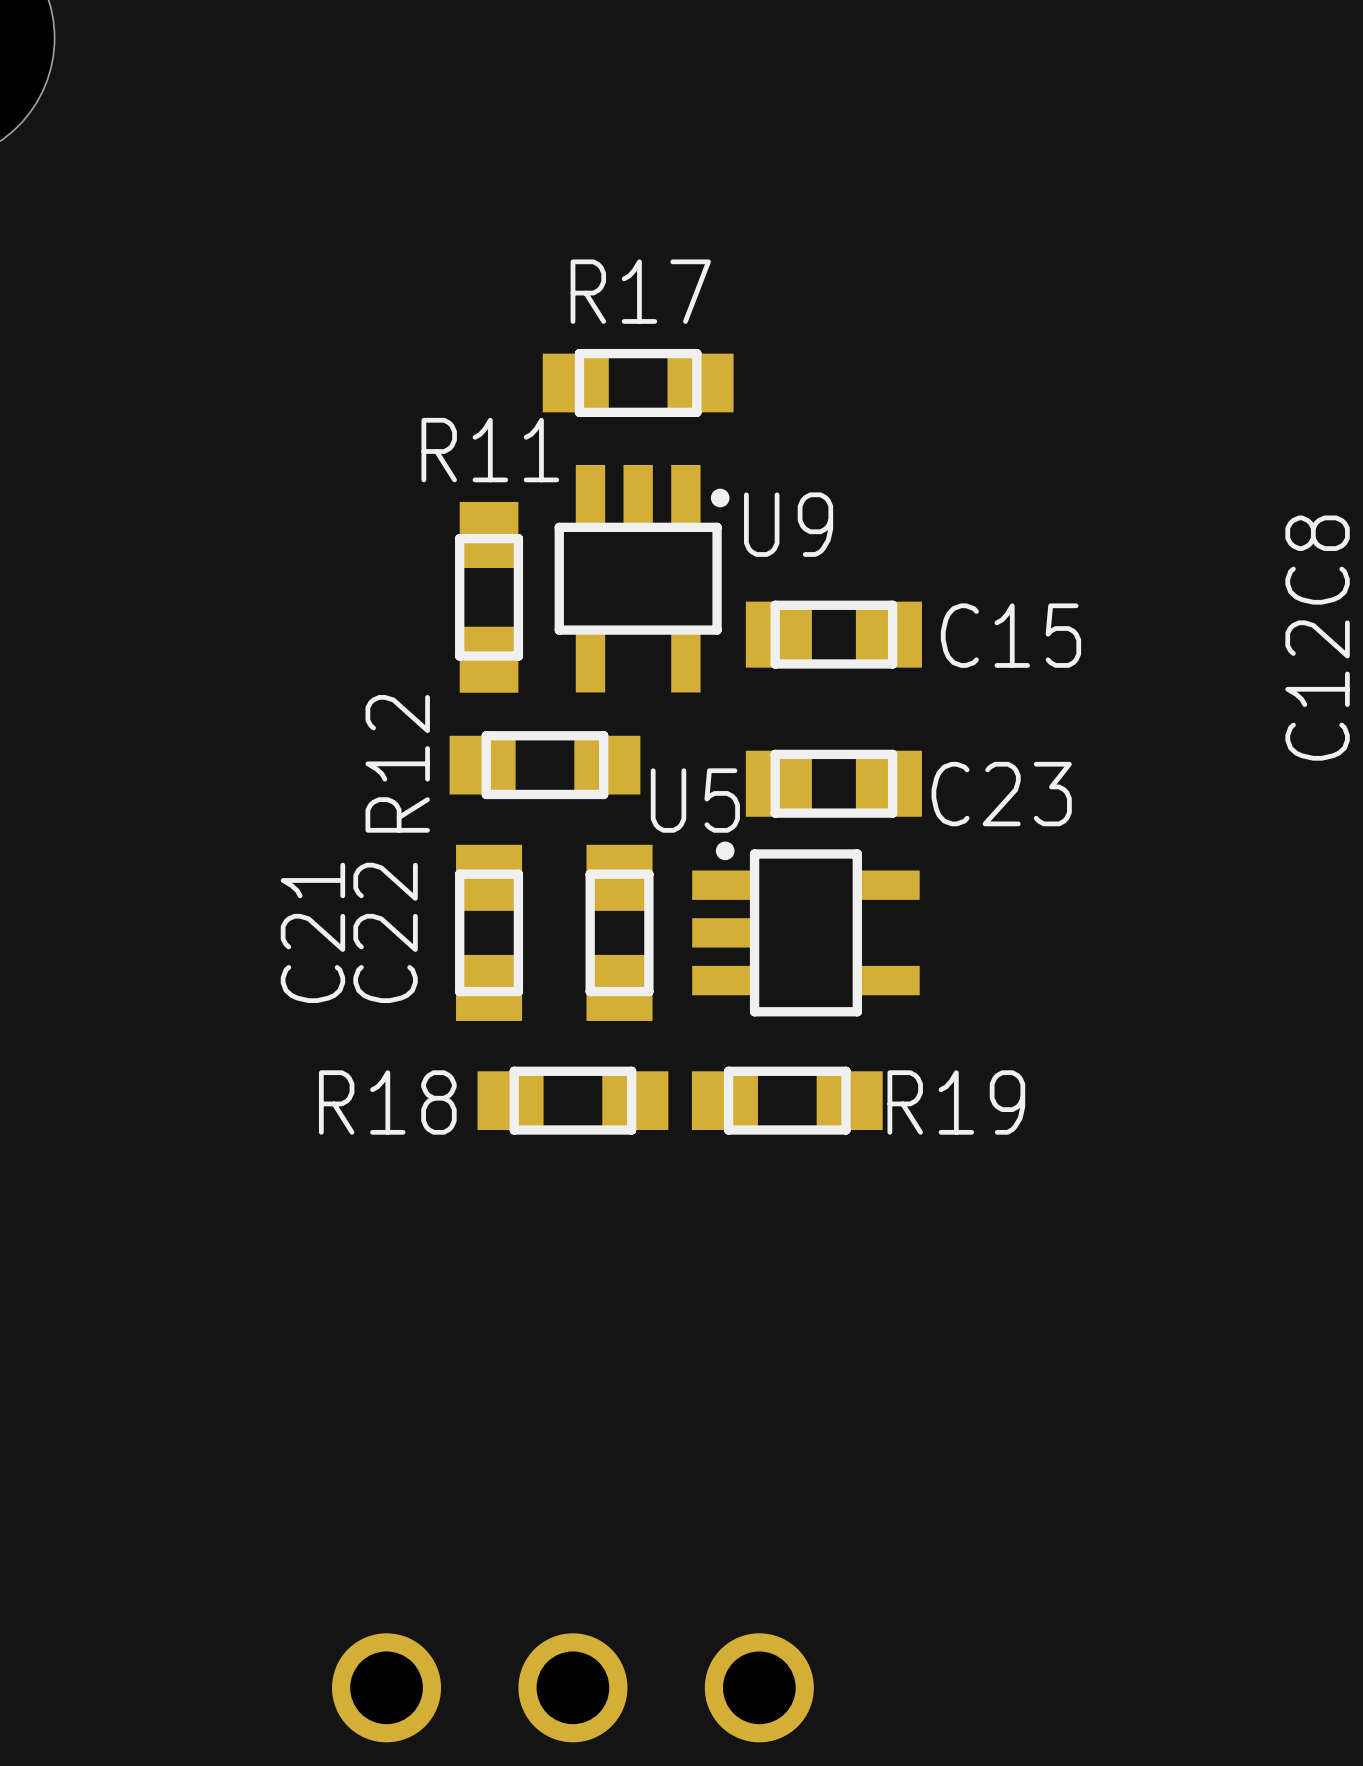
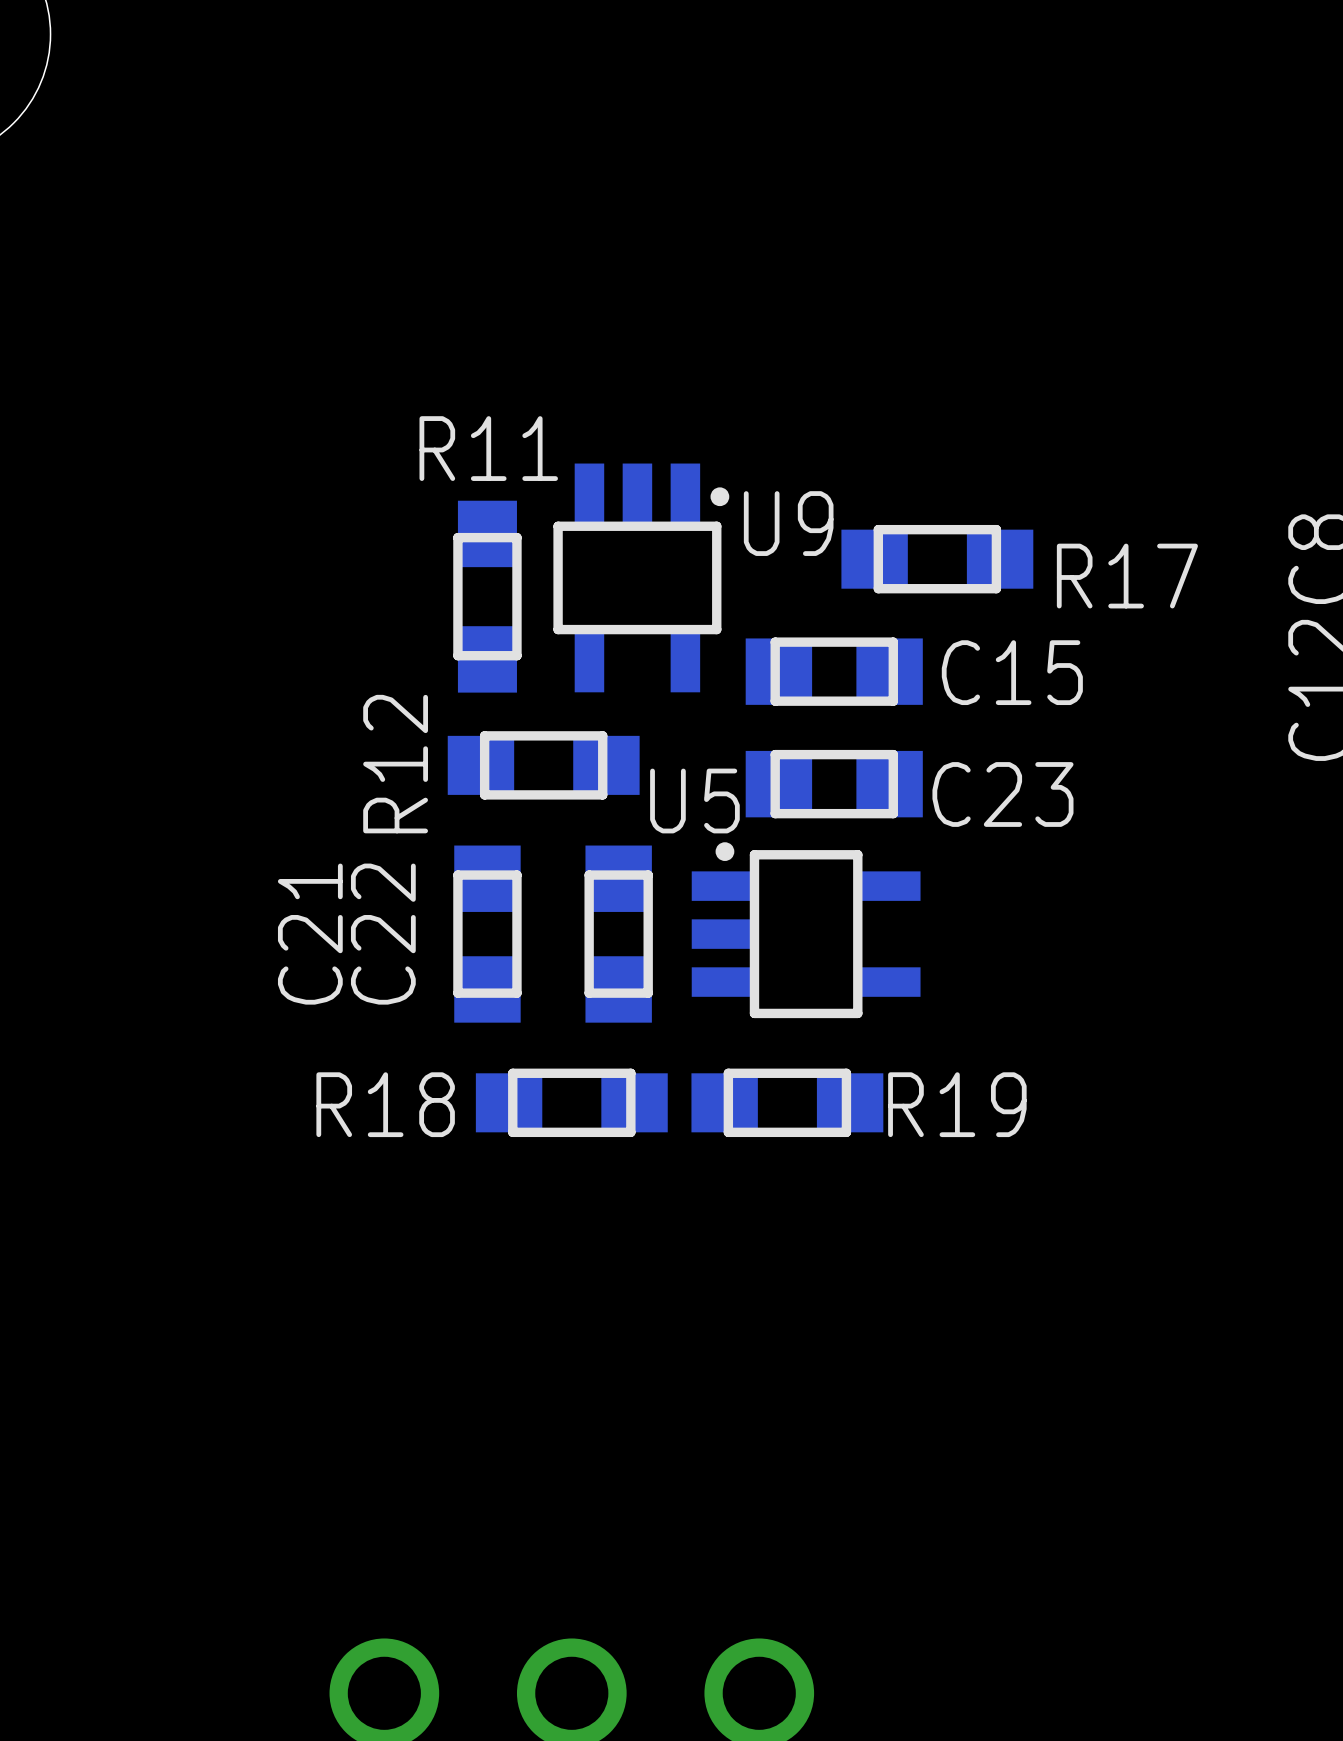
R17 name position: R17 (640, 291) -> R17 (1127, 576)
R17 position: (638, 382) -> (937, 559)
C15 position: (833, 634) -> (834, 671)

